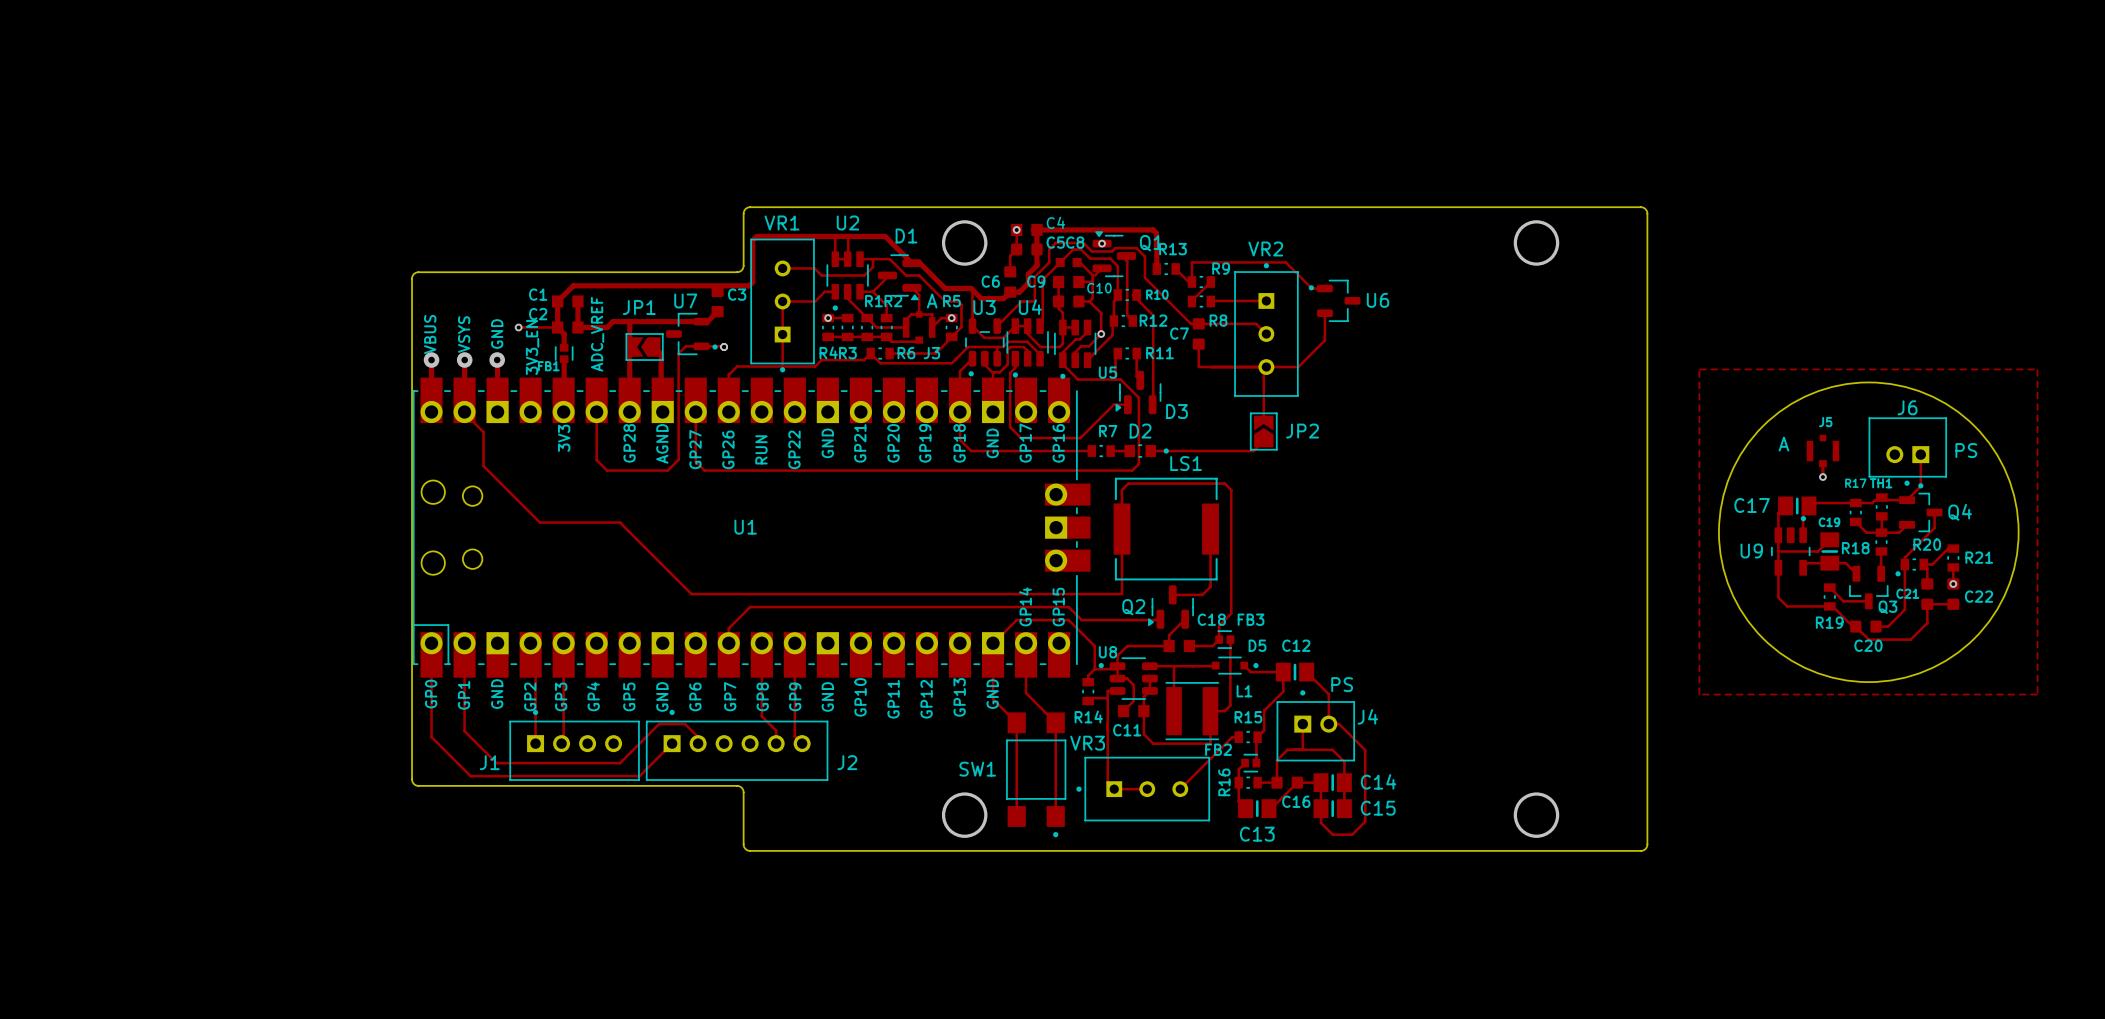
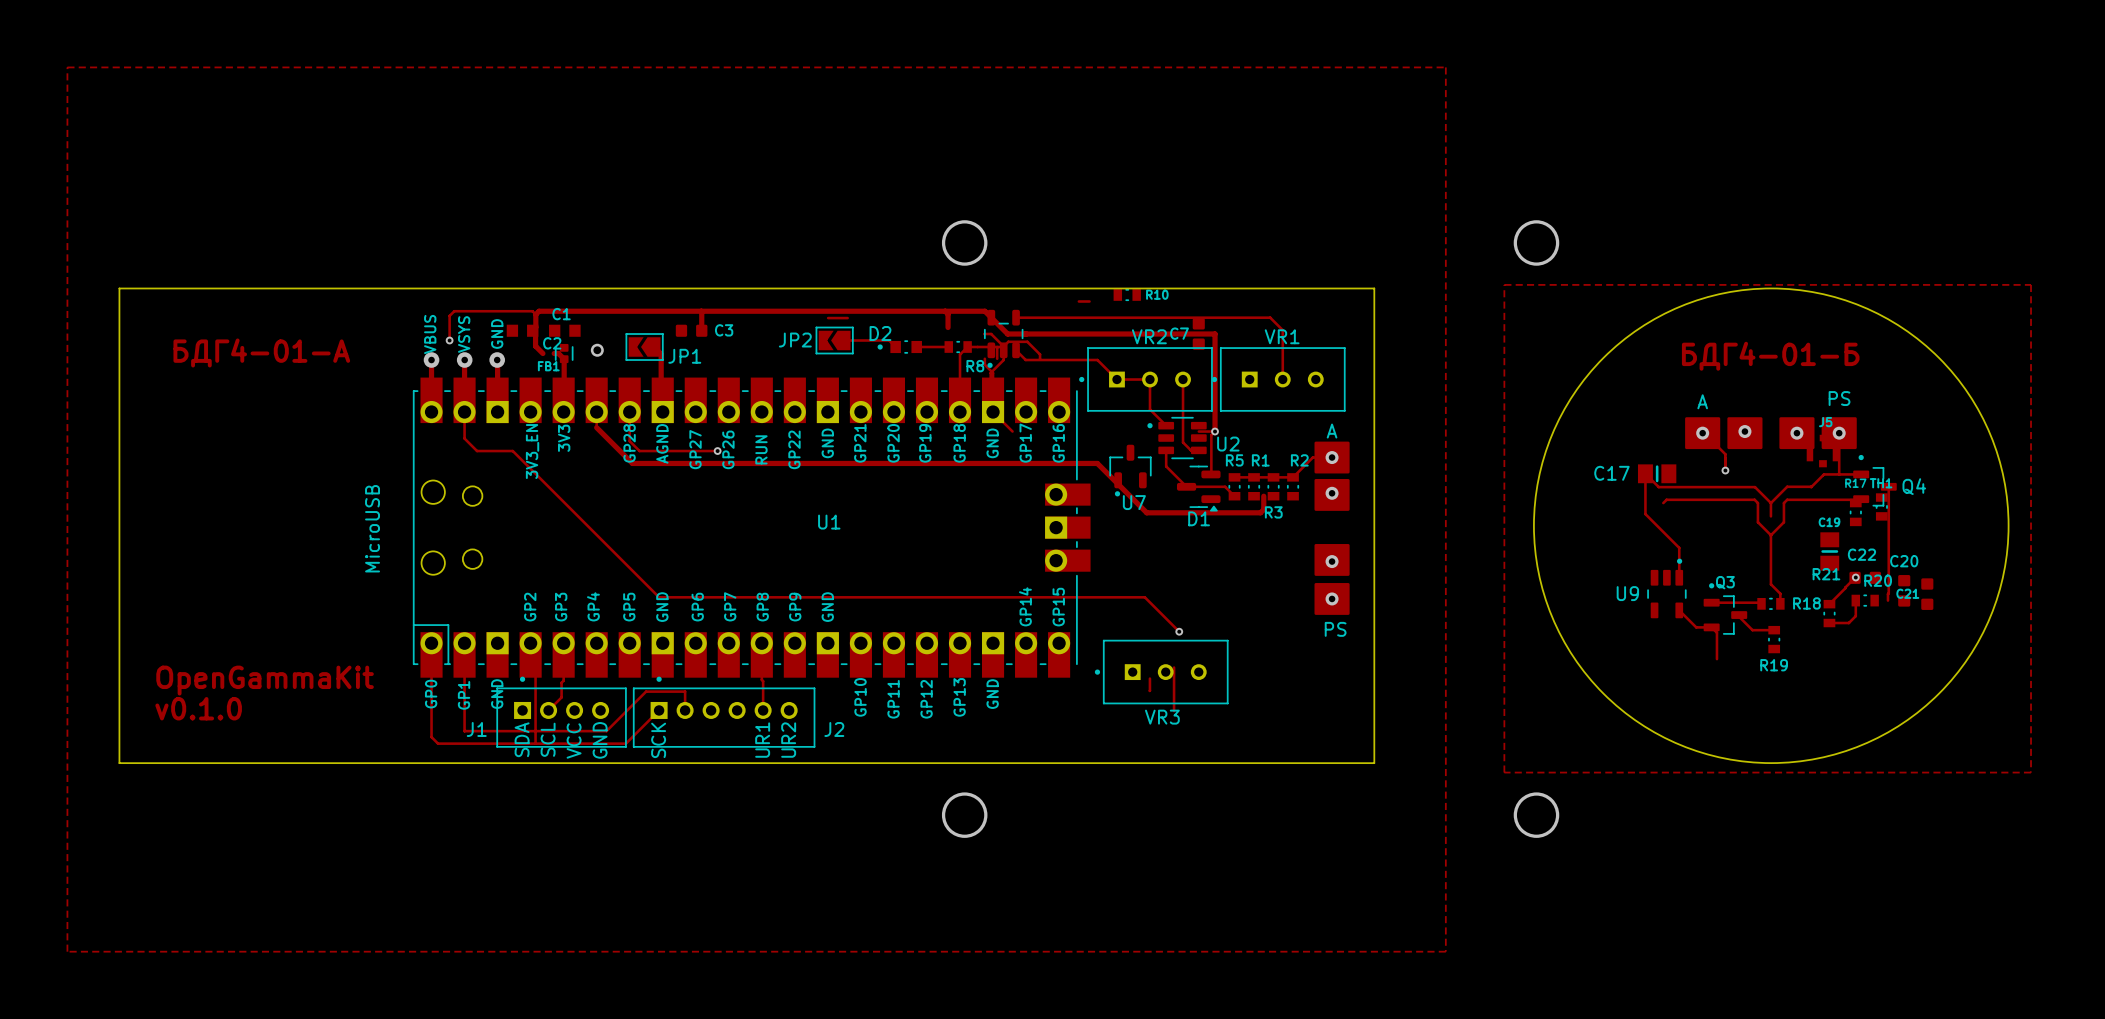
zone outline: none -> (67, 67) (1445, 67) (1445, 951) (67, 951) (67, 67)
board edge: (750, 207) (1644, 208) (1647, 213) (1646, 848) (1640, 850) (750, 850) (745, 849) (743, 845) (743, 791) (737, 785) (414, 784) (412, 779) (412, 275) (418, 272) (738, 272) (743, 266) (743, 212) (745, 209) (750, 207) -> none
VR1 name position: VR1 (782, 222) -> VR1 (1282, 336)
text: U2 (847, 222) -> none
track: (1016, 229) (1016, 249) (1010, 255) (1010, 271) -> none
via: (1016, 229) -> none
C4: (1026, 229) -> none
track: (1033, 229) (1153, 229) (1156, 233) (1156, 268) -> none
track: (1036, 229) (1036, 265) (1028, 274) (1028, 283) (1019, 292) (1010, 292) (1003, 298) (981, 298) (971, 288) -> none
D1 name position: D1 (906, 235) -> D1 (1199, 518)
track: (834, 236) (835, 259) (847, 259) -> none
track: (847, 236) (848, 259) -> none
via: (1102, 243) -> none
VR2 name position: VR2 (1265, 248) -> VR2 (1149, 336)
C5: (1026, 249) -> none
Q1: (1114, 254) -> none
track: (1124, 258) (1127, 261) (1127, 315) (1132, 321) -> none
track: (860, 259) (889, 259) (906, 275) (919, 275) (945, 301) (958, 301) (961, 304) (961, 327) (935, 353) (889, 353) -> none
track: (873, 259) (873, 267) (864, 275) (821, 275) (814, 268) (782, 268) -> none
C8: (1068, 262) -> none
track: (1077, 262) (1079, 262) (1092, 275) -> none
track: (1102, 268) (1092, 275) -> none
R13: (1166, 268) -> none
track: (1175, 268) (1188, 281) (1191, 281) (1192, 262) (1285, 262) (1311, 288) (1324, 288) -> none
track: (887, 275) (873, 291) -> none
track: (1092, 275) (1092, 298) (1089, 301) (1101, 313) (1101, 334) (1088, 346) (1081, 346) (1075, 352) (1075, 360) -> none
D1 position: (899, 277) -> (1198, 488)
part: (847, 280) -> none
C6: (1010, 281) -> none
track: (1058, 281) (1058, 308) (1062, 312) (1062, 343) (1059, 347) (1040, 347) (1027, 334) (1027, 326) (1015, 326) (1003, 337) (984, 337) (972, 326) (971, 288) -> none
C9: (1068, 281) -> none
track: (1078, 281) (1092, 281) -> none
R9: (1201, 281) -> none
track: (1210, 281) (1191, 301) -> none
zone outline: none -> (1504, 284) (2031, 284) (2031, 772) (1504, 772) (1504, 284)
track: (911, 287) (919, 295) (919, 314) -> none
board edge: none -> (119, 288) (1374, 288) (1374, 763) (119, 763) (119, 288)
track: (971, 288) (945, 288) (919, 263) (911, 263) (885, 236) (756, 236) (752, 240) (752, 282) (749, 285) (573, 285) (557, 301) (557, 327) -> none
round board edge: none -> [1533, 288, 2009, 764]
track: (835, 291) (824, 291) (815, 301) (782, 301) (782, 366) -> none
track: (847, 291) (847, 298) (876, 327) (906, 327) (906, 319) (911, 314) (932, 314) -> none
track: (860, 291) (873, 291) -> none
track: (873, 291) (886, 305) (886, 318) -> none
C1 name position: C1 (538, 294) -> C1 (561, 314)
track: (1132, 294) (1153, 315) (1152, 404) -> none
track: (1266, 300) (1210, 301) -> none
U6: (1334, 300) -> none
C1 position: (567, 301) -> (564, 330)
track: (577, 301) (577, 327) (607, 327) (612, 321) (707, 321) (717, 311) -> none
U7 name position: U7 (685, 301) -> U7 (1134, 502)
C3 rotation: 0° (717, 301) -> 90° clockwise (691, 330)
C3 position: (717, 301) -> (691, 330)
text: A (932, 301) -> none
C10: (1068, 301) -> none
R8 position: (1201, 301) -> (958, 347)
VR1 rotation: 0° (782, 305) -> 90° clockwise (1278, 379)
VR1 position: (782, 305) -> (1278, 379)
JP1 name position: JP1 (639, 307) -> JP1 (684, 356)
track: none -> (701, 311) (701, 330)
track: none -> (945, 311) (948, 314) (948, 327)
track: (1324, 313) (1324, 340) (1298, 367) (1199, 367) (1198, 344) -> none
track: none -> (535, 314) (532, 311) (454, 311) (449, 315) (449, 340)
track: none -> (535, 314) (535, 346) (542, 353)
track: none -> (535, 314) (539, 311) (984, 311) (1007, 334) (1215, 334) (1215, 431)
C2 name position: C2 (538, 314) -> C2 (552, 343)
track: (932, 314) (932, 327) (941, 318) (951, 318) -> none
track: none -> (1016, 317) (1270, 317) (1282, 330) (1282, 379)
via: (828, 318) -> none
via: (951, 318) -> none
track: (629, 321) (629, 412) -> none
R12: (1123, 321) -> none
track: (997, 326) (1021, 301) (1034, 301) (1034, 276) (1049, 262) (1049, 249) (1055, 242) (1083, 242) (1091, 251) (1112, 251) (1115, 248) (1136, 248) (1144, 256) (1144, 277) (1190, 323) (1256, 323) (1266, 334) -> none
track: (1040, 326) (1042, 323) (1042, 280) (1073, 249) (1081, 249) (1090, 258) (1110, 258) (1117, 266) (1117, 297) (1113, 301) (1112, 335) (1087, 360) -> none
track: (518, 327) (557, 327) -> none
via position: (518, 327) -> (449, 340)
track: (557, 327) (564, 334) (564, 347) -> none
C2 position: (567, 327) -> (522, 330)
R4: (828, 327) -> none
R3 position: (847, 327) -> (1273, 486)
R1 position: (867, 327) -> (1254, 486)
R2 position: (886, 327) -> (1293, 486)
J3: (919, 327) -> none
R5 position: (951, 327) -> (1234, 486)
track: (1062, 327) (1075, 327) -> none
track: (1087, 327) (1087, 331) (1080, 339) (1075, 339) (1062, 352) (1062, 364) (1077, 379) (1116, 379) -> (1016, 350) (1025, 360) (1097, 360) (1116, 379)
VR2 rotation: 0° (1266, 329) -> 90° counterclockwise (1145, 379)
VR2 position: (1266, 329) -> (1145, 379)
U7 rotation: 0° (691, 334) -> 90° clockwise (1130, 470)
U7 position: (691, 334) -> (1130, 470)
track: none -> (984, 334) (991, 334) (1003, 346) (1003, 360) (990, 373) (990, 409) (1012, 431)
via: (1101, 334) -> none
track: (828, 336) (886, 336) (891, 341) (919, 340) -> none
part: none -> (1003, 338)
track: none -> (844, 340) (889, 340) (895, 347)
track: (724, 347) (685, 346) (678, 353) (678, 459) (667, 470) (607, 470) (596, 460) (596, 427) -> (1263, 496) (1263, 509) (1260, 512) (1146, 512) (1097, 463) (632, 463) (596, 427)
via: (724, 347) -> none
track: none -> (916, 347) (948, 347)
track: (968, 347) (951, 363) (880, 363) (870, 353) (864, 360) (821, 360) (815, 366) (737, 366) (728, 374) (728, 413) -> none
U3: (984, 347) -> none
U4: (1027, 347) -> none
U5: (1075, 349) -> none
via: none -> (597, 350)
text: none -> БДГ4-01-А (261, 352)
track: none -> (554, 353) (558, 353) (564, 359)
R6: (880, 353) -> none
track: (1117, 353) (1115, 355) (1115, 379) -> none
R11: (1127, 353) -> none
track: (1136, 353) (1136, 376) (1140, 380) -> none
text: none -> БДГ4-01-Б (1770, 356)
track: (972, 358) (960, 371) -> (968, 347) (960, 354) (960, 371)
track: (1015, 358) (1015, 367) (1010, 373) (1010, 427) (1021, 438) (1080, 438) (1113, 404) (1127, 404) -> none
track: (1027, 358) (1027, 350) (1023, 347) (1010, 347) (1007, 349) (1007, 364) (999, 372) (993, 372) -> none
track: (1263, 367) (1263, 422) -> none
zone outline: (1699, 369) (2037, 369) (2037, 694) (1699, 694) (1699, 369) -> none
U1 footprint: [412, 377, 1091, 678] -> [412, 377, 1091, 678]
track: (1120, 379) (1138, 397) (1138, 464) (1132, 470) (704, 470) (695, 461) (695, 413) -> (1120, 379) (1150, 379) (1150, 409) (1166, 425)
track: none -> (1183, 379) (1183, 442) (1190, 450) (1198, 450)
round board edge: [1718, 382, 2019, 683] -> none
D3: (1138, 392) -> none
track: (960, 412) (960, 439) (971, 451) (1091, 451) -> none
track: (464, 413) (483, 432) (483, 466) (539, 522) (620, 522) (691, 594) (1121, 594) (1121, 490) (1128, 483) (1224, 483) (1231, 490) (1231, 613) (1219, 625) (1219, 639) (1212, 646) (1189, 646) -> (464, 413) (464, 438) (477, 451) (512, 451) (659, 597) (1144, 597) (1179, 631)
track: none -> (629, 413) (629, 441) (639, 451) (717, 451)
drawing: none -> [1685, 417, 1763, 450]
drawing: none -> [1779, 417, 1857, 450]
track: none -> (1198, 431) (1215, 431)
track: none -> (1215, 431) (1211, 435) (1210, 474)
via: none -> (1215, 431)
JP2 rotation: 0° (1263, 431) -> 90° counterclockwise (834, 340)
JP2 position: (1263, 431) -> (834, 340)
JP2 name position: JP2 (1302, 431) -> JP2 (795, 340)
text: none -> A (1332, 431)
via: none -> (1744, 431)
track: none -> (1702, 433) (1725, 454) (1725, 470)
via: none -> (1702, 433)
via: none -> (1796, 433)
track: none -> (1839, 433) (1839, 474)
via: none -> (1839, 433)
U2: none -> (1177, 438)
track: (1263, 440) (1253, 451) (1150, 451) -> none
drawing: none -> [1314, 441, 1350, 511]
text position: A (1783, 444) -> A (1702, 401)
track: none -> (1166, 450) (1166, 466) (1186, 486) (1225, 486) (1234, 496)
text position: PS (1966, 450) -> PS (1839, 398)
via: none -> (717, 451)
R7: (1101, 451) -> none
track: (1110, 451) (1129, 451) -> none
D2 rotation: 0° (1146, 451) -> 180° (899, 347)
D2 position: (1146, 451) -> (899, 347)
J6: (1907, 452) -> none
track: (1920, 454) (1920, 486) (1907, 500) (1875, 500) (1872, 503) (1811, 503) (1803, 511) (1803, 535) -> none
track: none -> (1332, 457) (1312, 457) (1293, 477) (1234, 477)
via: none -> (1332, 457)
track: (1822, 463) (1822, 477) -> (1770, 503) (1770, 516)
via: none -> (1725, 470)
track: none -> (1645, 473) (1645, 514) (1679, 547) (1679, 577)
track: none -> (1645, 473) (1658, 487) (1755, 487) (1770, 503)
track: none -> (1861, 474) (1823, 474) (1811, 487) (1787, 486) (1770, 503)
via: (1822, 477) -> none
track: none -> (1888, 486) (1887, 600)
via: none -> (1332, 493)
track: none -> (1861, 499) (1787, 499) (1783, 503) (1783, 522) (1770, 535)
track: none -> (1663, 503) (1666, 499) (1754, 499) (1757, 503) (1757, 522) (1770, 535) (1770, 584) (1780, 593) (1780, 603)
track: (1785, 505) (1778, 513) (1778, 597) (1787, 606) (1832, 606) (1852, 626) (1855, 626) -> none
C17 position: (1797, 505) -> (1657, 473)
Q4 position: (1920, 506) -> (1874, 480)
track: (1934, 512) (1934, 527) (1904, 557) (1904, 609) (1887, 626) (1876, 626) -> none
track: (1881, 516) (1881, 532) -> none
track: (1855, 521) (1866, 532) (1899, 532) (1907, 524) -> none
U1 name position: U1 (745, 527) -> U1 (829, 522)
text: none -> MicroUSB (372, 528)
LS1: (1166, 529) -> none
track: (1210, 529) (1210, 586) (1202, 594) (1172, 594) -> none
track: (1829, 539) (1818, 551) (1778, 551) -> none
R18 rotation: 0° (1881, 542) -> 90° clockwise (1770, 603)
R18 position: (1881, 542) -> (1770, 603)
drawing: none -> [1314, 544, 1350, 615]
U9 position: (1790, 545) -> (1666, 588)
R18 name position: R18 (1855, 548) -> R18 (1806, 603)
track: (1953, 548) (1948, 548) (1932, 564) (1923, 564) (1927, 568) (1927, 584) -> none
track: (1881, 551) (1881, 573) -> none
R21 position: (1953, 557) -> (1829, 613)
R21 name position: R21 (1979, 557) -> R21 (1826, 574)
via: none -> (1332, 561)
R20 position: (1914, 564) -> (1865, 600)
track: (1803, 567) (1807, 563) (1845, 563) (1856, 573) -> none
track: (1953, 567) (1953, 584) -> none
track: none -> (1855, 577) (1829, 604)
via: none -> (1855, 577)
via: (1953, 584) -> none
track: (1829, 587) (1843, 601) (1868, 601) -> none
Q3 rotation: 0° (1874, 587) -> 90° counterclockwise (1725, 608)
Q3 position: (1874, 587) -> (1725, 608)
C22 rotation: 0° (1953, 594) -> 90° clockwise (1865, 577)
C22 position: (1953, 594) -> (1865, 577)
C22 name position: C22 (1979, 596) -> C22 (1861, 554)
R19 position: (1829, 597) -> (1774, 639)
via: none -> (1332, 598)
track: none -> (1855, 600) (1855, 616) (1848, 623) (1829, 623)
track: none -> (1711, 602) (1761, 603)
track: (1953, 604) (1927, 604) (1927, 623) (1910, 639) (1868, 639) (1855, 626) -> none
Q2: (1170, 607) -> none
track: none -> (1679, 610) (1696, 627) (1711, 627)
track: none -> (1739, 616) (1752, 630) (1774, 630)
track: (1160, 619) (1081, 620) (1068, 607) (750, 607) (728, 628) (728, 644) -> none
track: (1185, 619) (1169, 635) (1169, 646) (1127, 646) (1117, 655) (1117, 666) (1111, 666) -> none
C20 rotation: 0° (1865, 626) -> 90° clockwise (1904, 590)
C20 position: (1865, 626) -> (1904, 590)
track: none -> (1713, 629) (1716, 632) (1716, 659)
via: none -> (1179, 631)
FB3: (1224, 639) -> none
track: (1230, 639) (1230, 705) (1224, 711) (1210, 711) (1210, 743) (1153, 743) (1143, 734) (1143, 697) (1149, 690) (1153, 690) -> none
track: (993, 643) (1016, 620) (1068, 620) (1094, 646) (1094, 669) -> none
C20 name position: C20 (1868, 645) -> C20 (1904, 561)
C18: (1179, 646) -> none
track: (993, 663) (993, 699) (1016, 722) (1016, 816) -> none
track: (1213, 665) (1215, 665) (1143, 666) -> none
D5: (1235, 665) -> none
track: (1244, 665) (1250, 672) (1283, 672) (1283, 691) (1264, 710) (1264, 730) (1256, 738) (1256, 763) -> none
track: (1094, 669) (1088, 675) (1088, 682) -> none
track: (1094, 669) (1117, 669) (1117, 678) (1127, 678) (1133, 685) (1133, 700) (1123, 711) -> none
C12: (1294, 672) -> none
track: (1306, 672) (1328, 694) (1328, 724) (1339, 724) (1365, 750) (1365, 821) (1352, 834) (1332, 834) (1321, 822) (1321, 782) (1297, 782) (1271, 808) (1268, 808) -> none
track: (794, 676) (794, 736) (802, 743) -> none
track: (1026, 676) (1026, 693) (1055, 722) (1055, 816) -> none
U8: (1128, 678) -> none
track: (761, 679) (761, 716) (776, 730) (776, 743) -> (761, 679) (763, 710)
text: none -> OpenGammaKit (265, 680)
track: (563, 680) (563, 735) (561, 737) (561, 743) -> (563, 680) (561, 682) (561, 697) (548, 710)
text position: PS (1342, 684) -> PS (1335, 629)
track: (1117, 690) (1107, 690) (1107, 782) (1114, 789) (1147, 789) -> none
R14: (1088, 691) -> none
track: (1107, 698) (1091, 698) (1088, 701) -> none
text: none -> v0.1.0 (198, 708)
track: none -> (685, 710) (685, 691) (646, 691) (606, 731) (465, 730)
C11: (1133, 711) -> none
L1: (1192, 711) -> none
track: (1302, 724) (1302, 749) -> none
J4: (1315, 725) -> none
track: (464, 731) (496, 763) (620, 763) (659, 724) (685, 724) (698, 737) (698, 743) -> none
track: (1238, 737) (1232, 737) (1180, 789) -> none
R15: (1248, 737) -> none
text: none -> SDA (522, 739)
text: none -> SCL (548, 739)
text: none -> VCC (574, 740)
text: none -> GND (600, 740)
text: none -> SCK (658, 740)
text: none -> UR1 (762, 740)
text: none -> UR2 (788, 740)
track: (438, 743) (470, 776) (639, 776) (672, 743) -> (438, 743) (625, 743) (659, 710)
VR3 name position: VR3 (1087, 743) -> VR3 (1162, 717)
J1 position: (574, 745) -> (561, 712)
J2 position: (737, 745) -> (724, 712)
track: (1245, 763) (1238, 769) (1238, 801) (1245, 808) -> none
FB2: (1250, 763) -> none
SW1: (1036, 774) -> none
R16: (1248, 782) -> none
track: (1257, 782) (1277, 782) (1277, 760) (1287, 749) (1332, 749) (1344, 761) (1344, 808) -> none
C16: (1287, 782) -> none
C14: (1332, 782) -> none
VR3 position: (1143, 789) -> (1161, 672)
C13: (1257, 808) -> none
C15: (1332, 808) -> none

